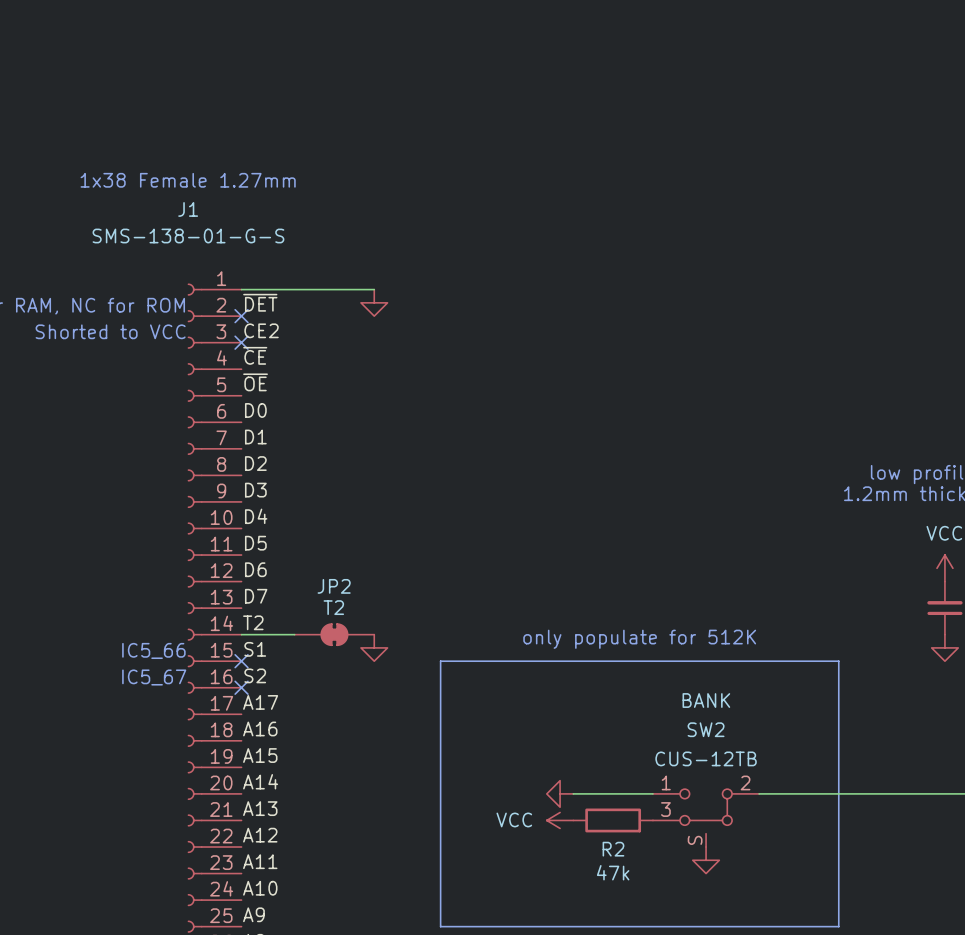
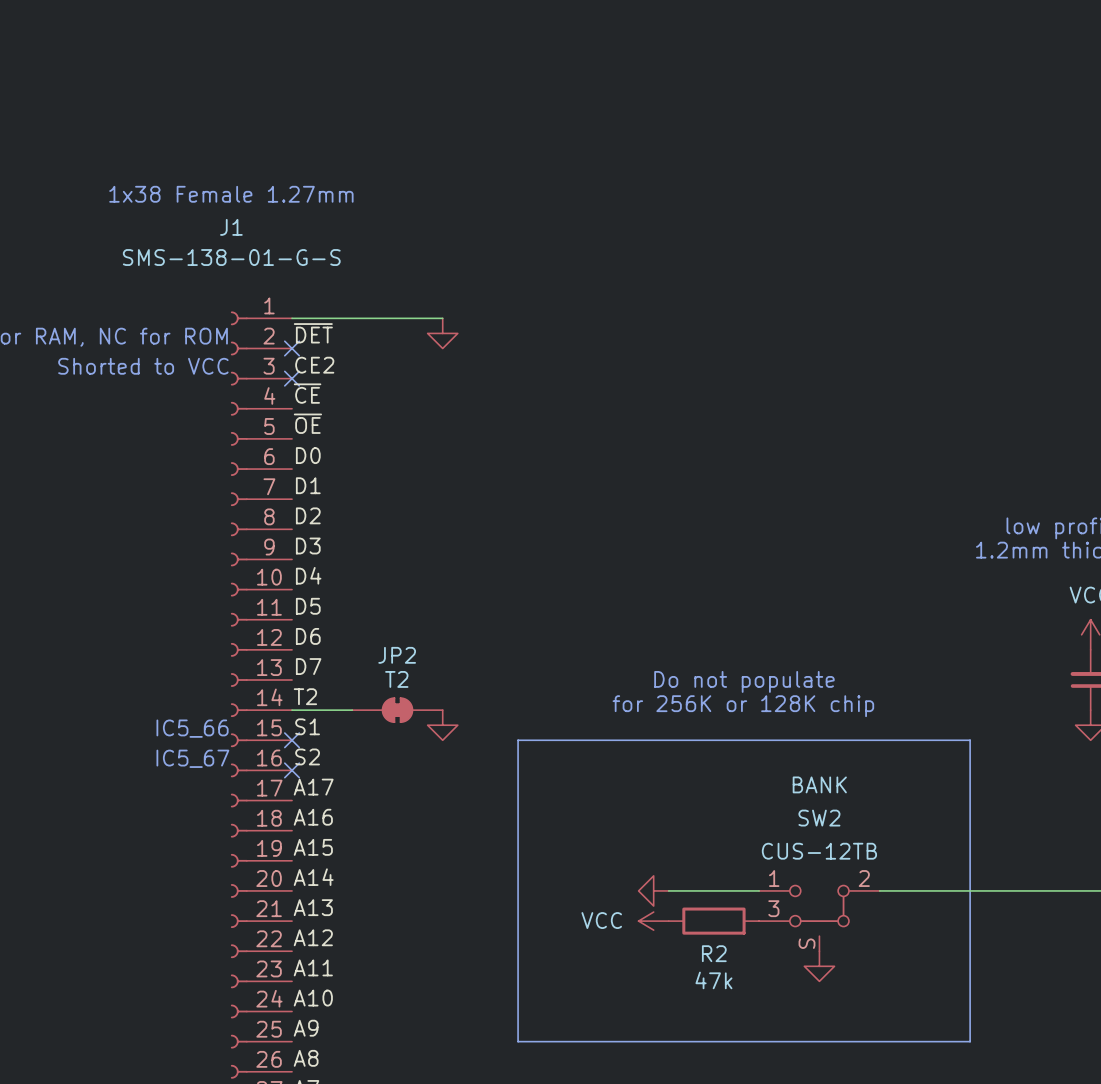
text: none -> Do not populate (744, 681)
text: none -> for 256K or 128K chip (743, 706)
text: only populate for 512K (639, 639) -> none

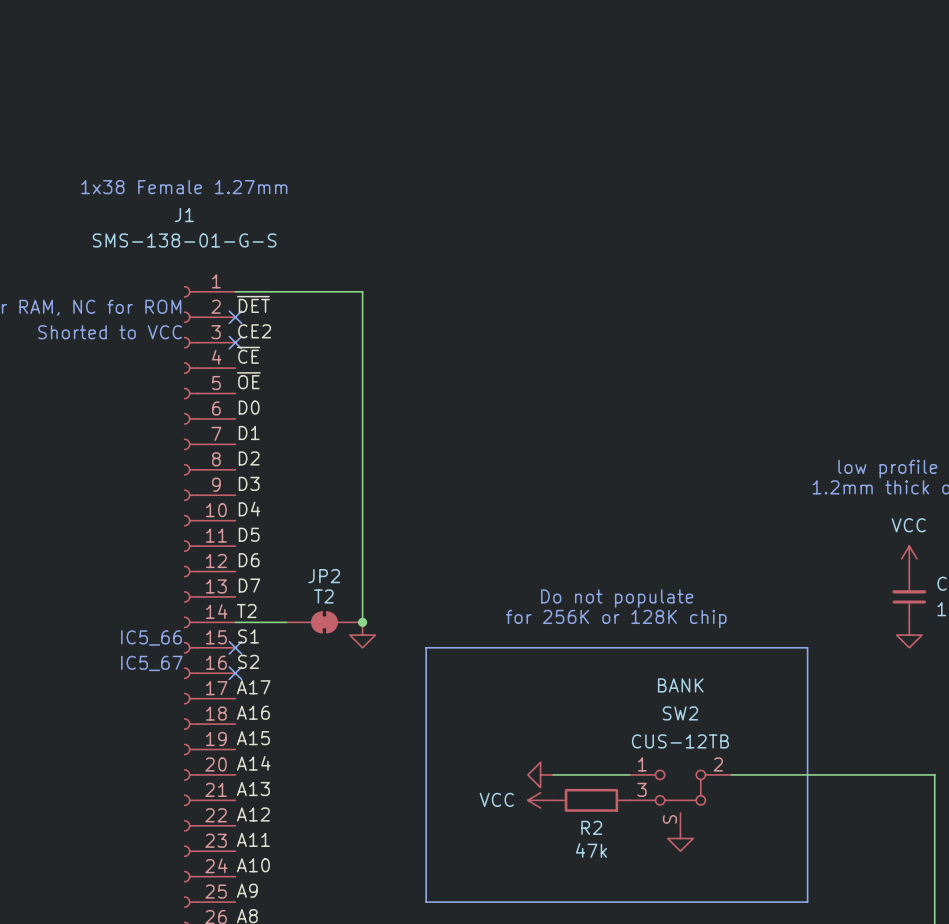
wire: none -> (362, 291) (362, 622)
power symbol: (442, 333) -> none
junction: none -> (362, 622)

